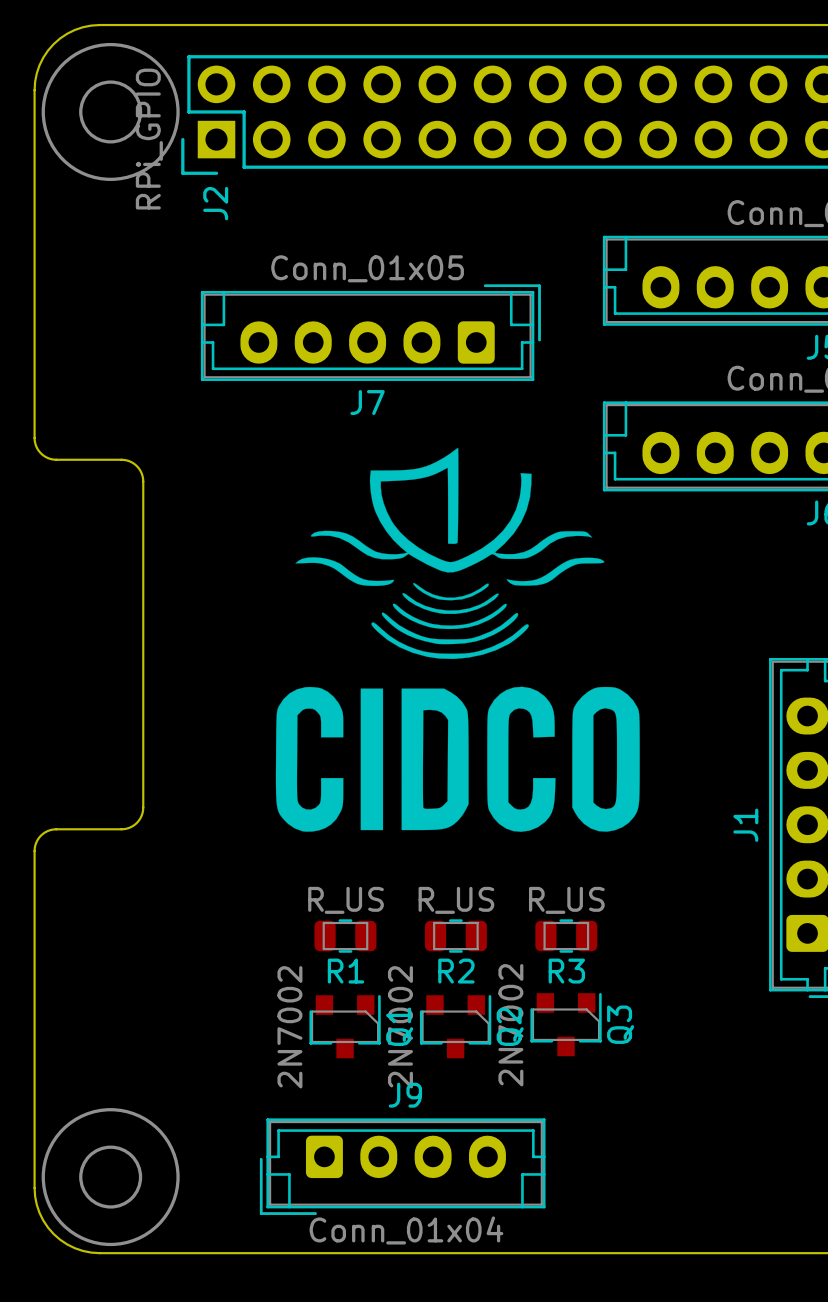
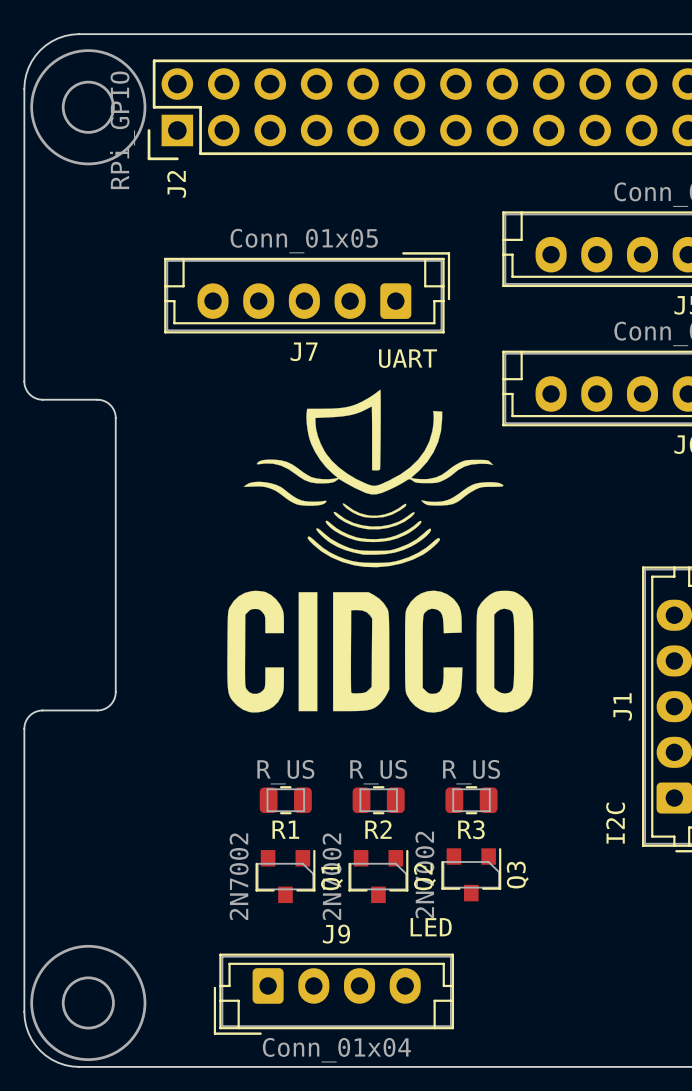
text: none -> UART (408, 358)
text: none -> I2C (615, 823)
text: none -> LED (431, 927)

